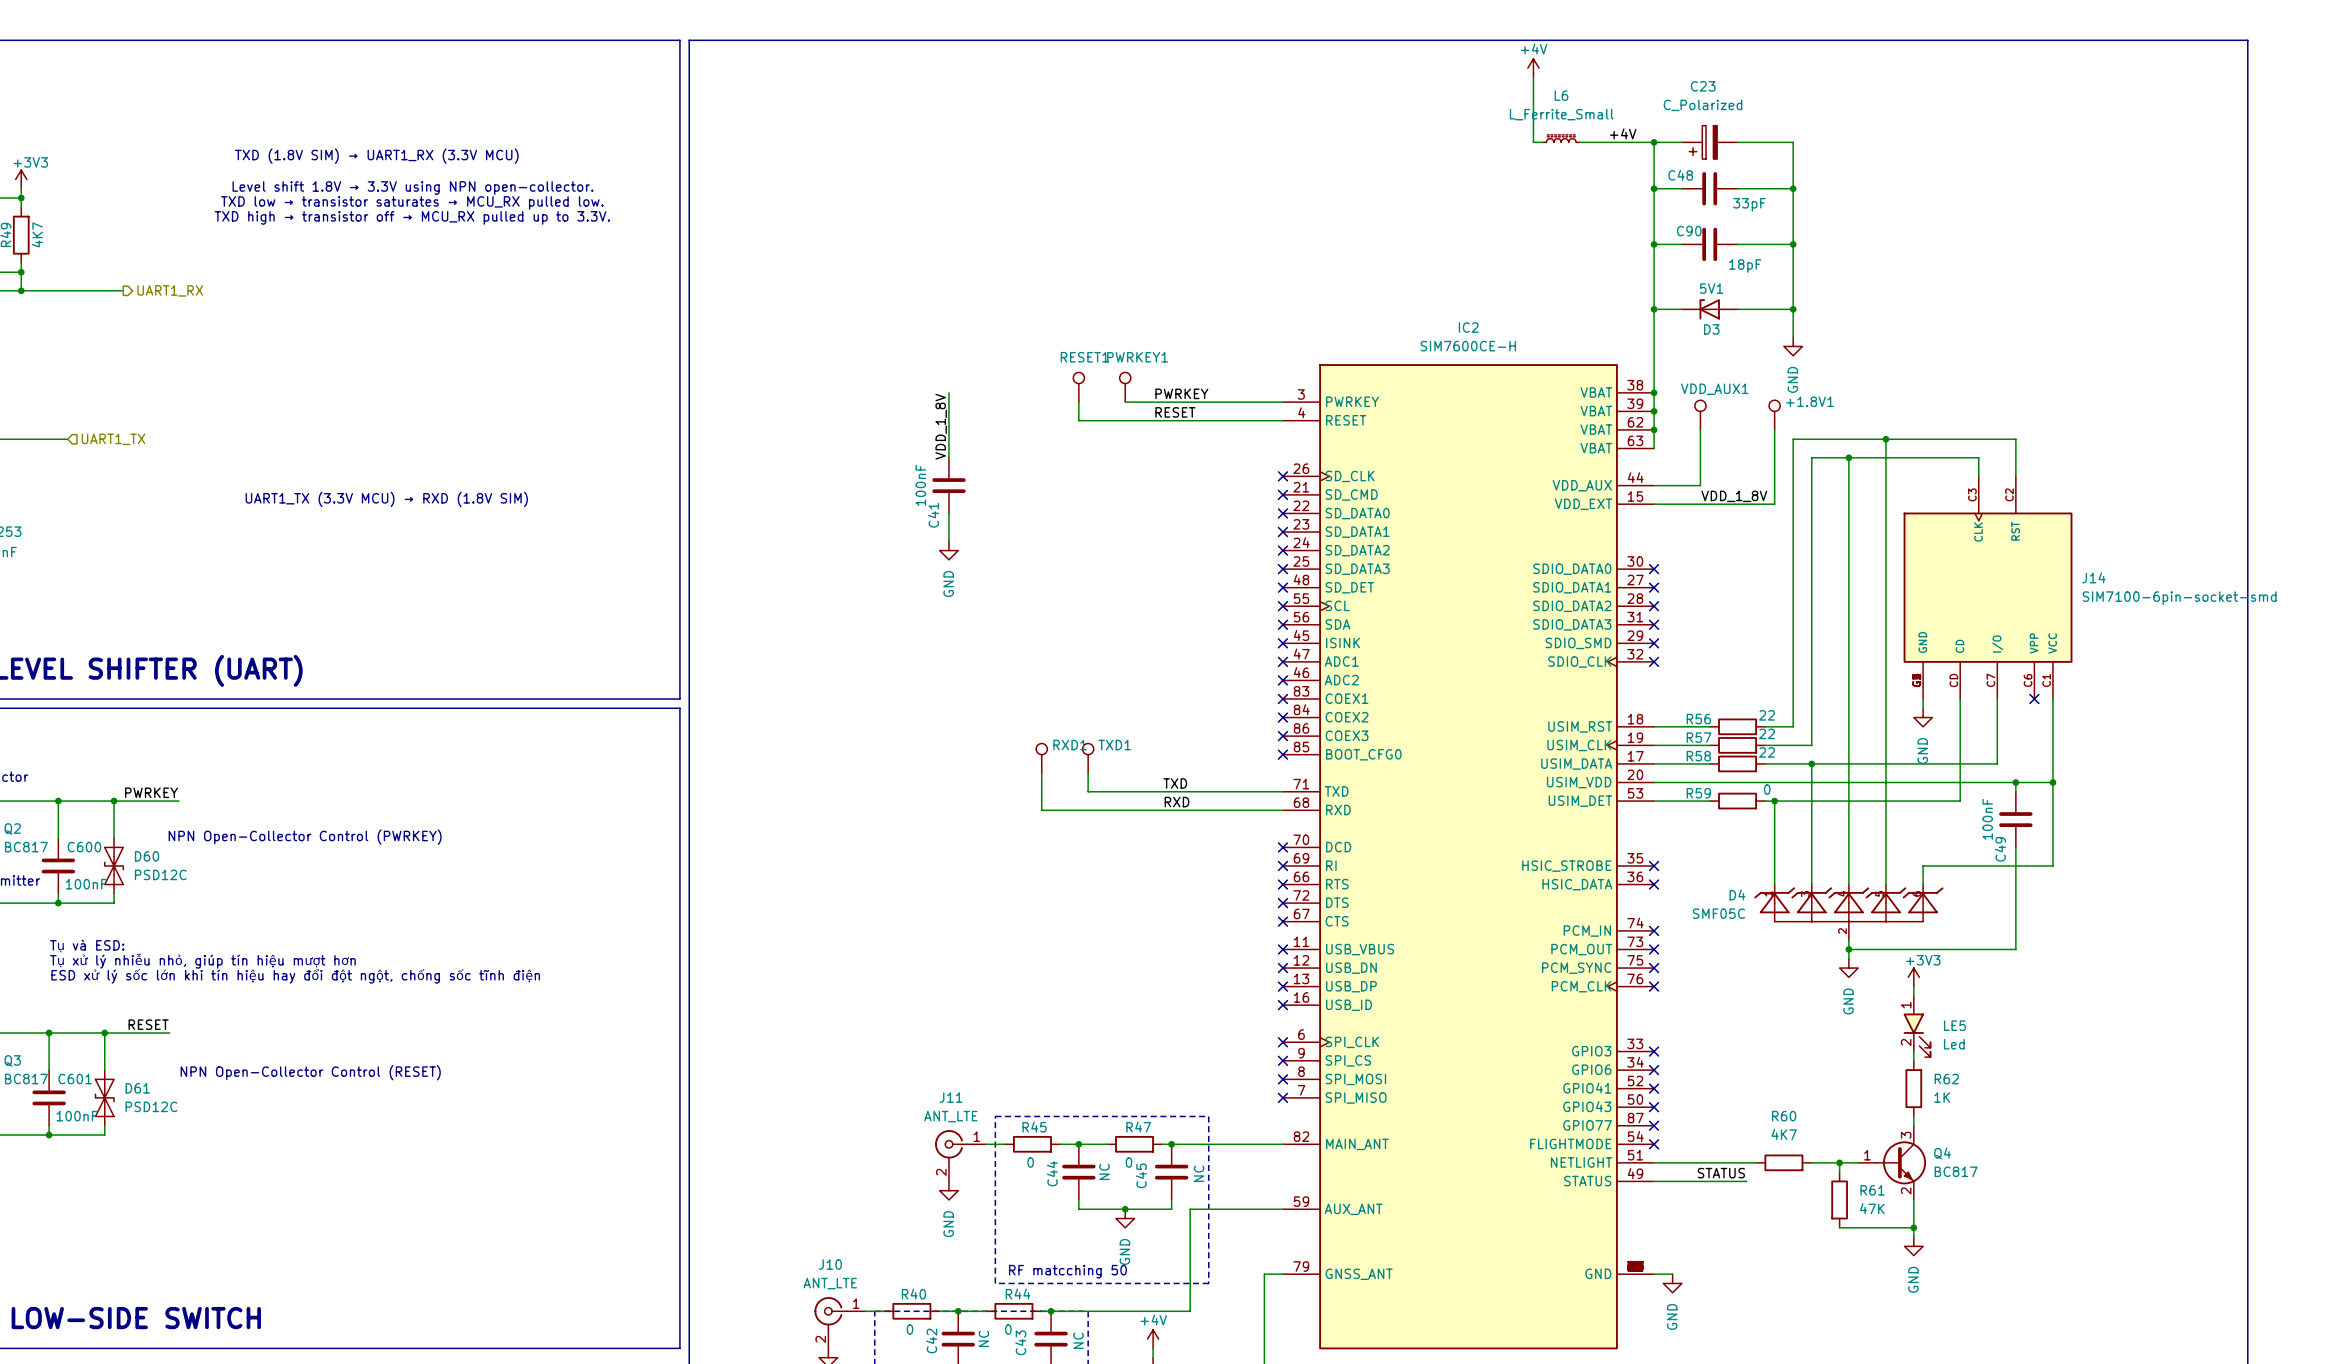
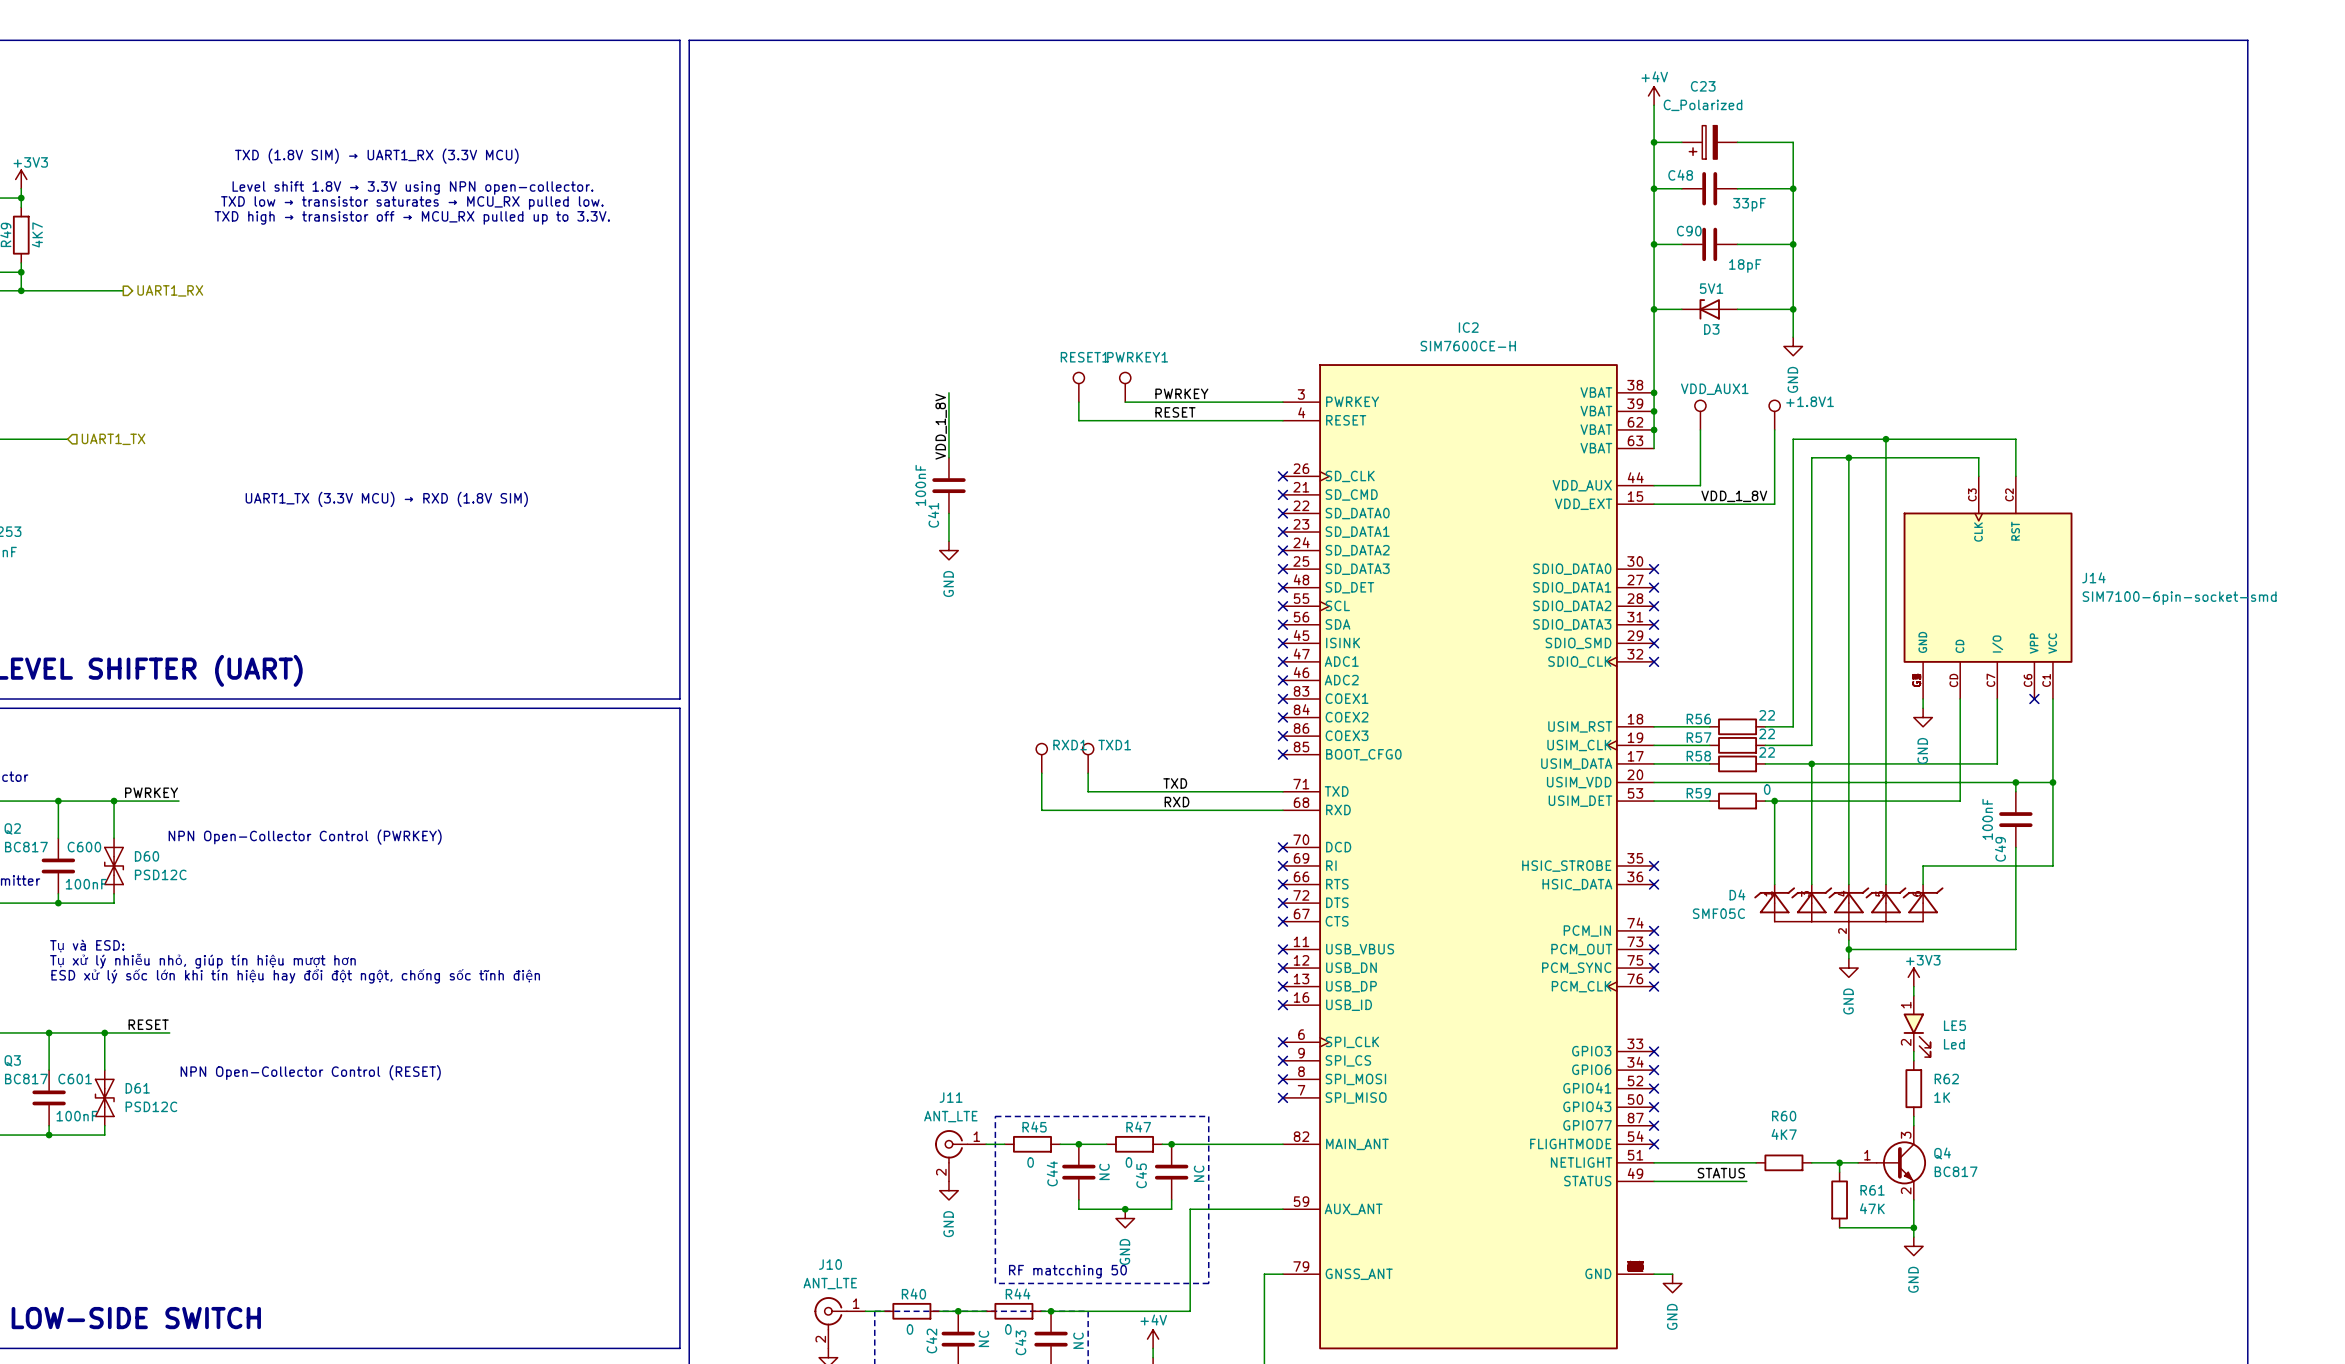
power symbol position: +4V (1533, 68) -> +4V (1654, 95)
wire: (1533, 77) (1533, 142) (1542, 142) -> none
label: +4V (1623, 133) -> none
L6: L_Ferrite_Small (1561, 138) -> none
wire: (1579, 142) (1654, 142) -> (1654, 105) (1654, 142)

